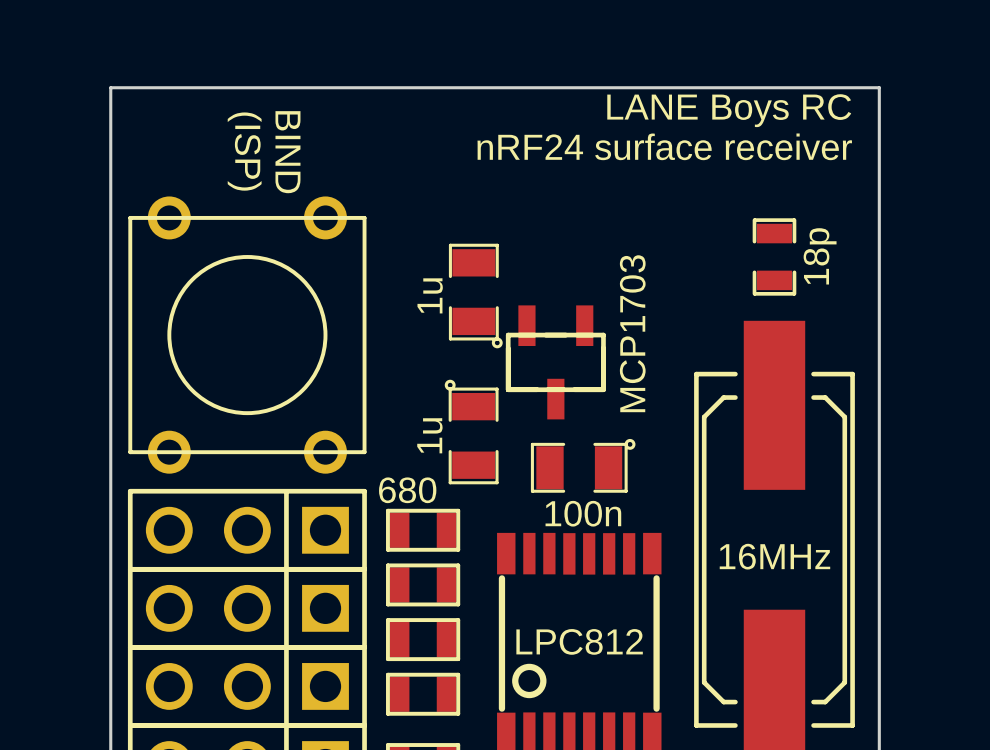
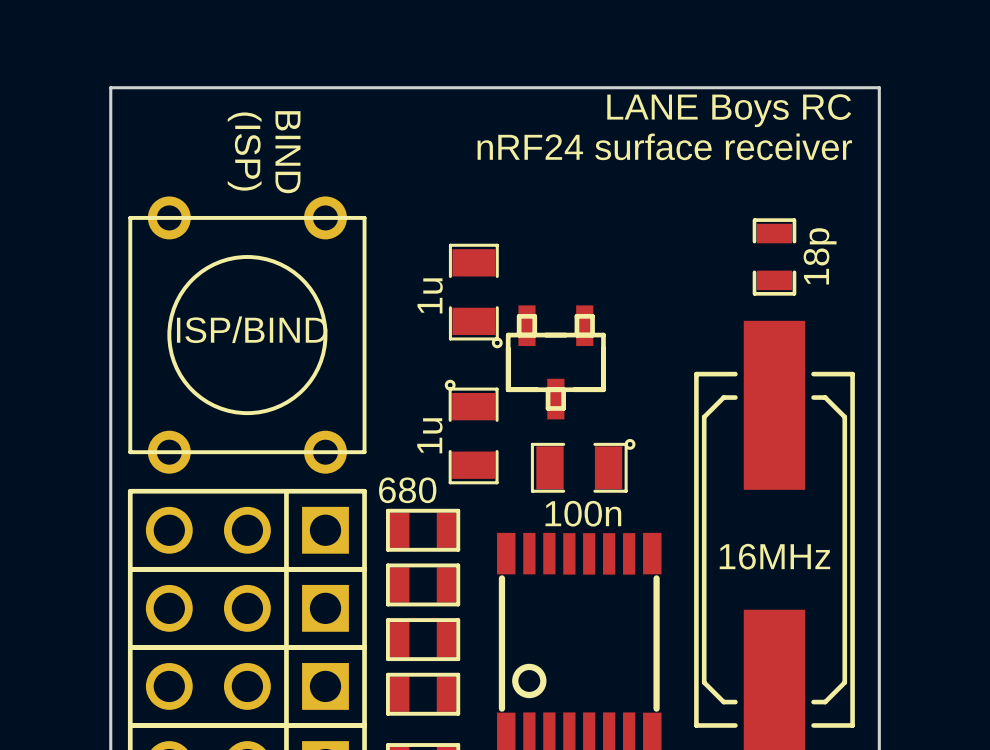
part footprint: [505, 305, 606, 420] -> [505, 305, 606, 420]
part value: none -> ISP/BIND (252, 329)
part value: MCP1703 (632, 333) -> none
part value: LPC812 (579, 641) -> none

